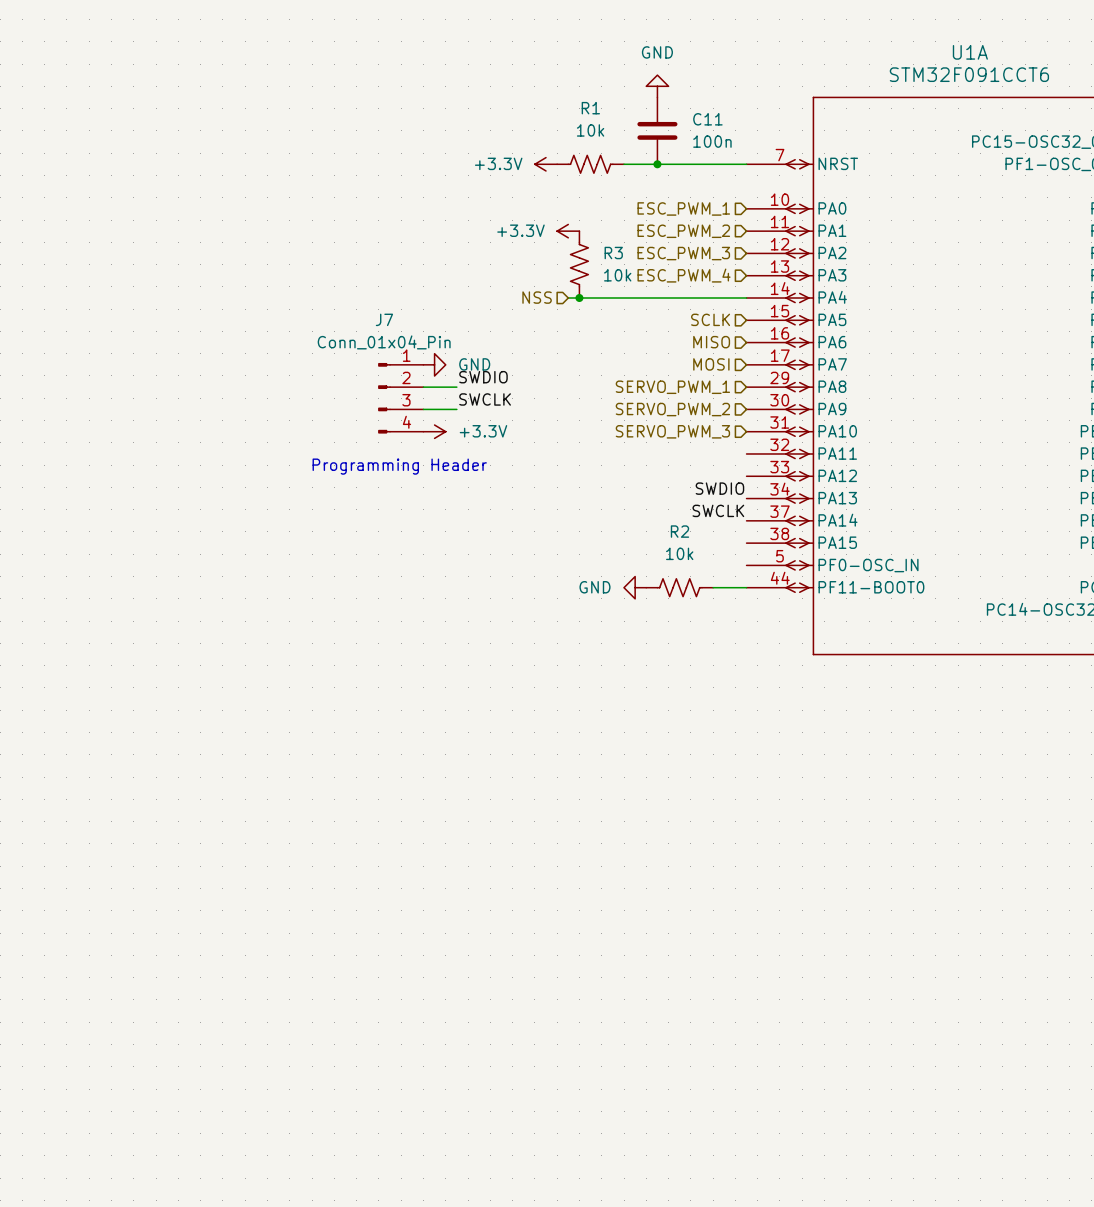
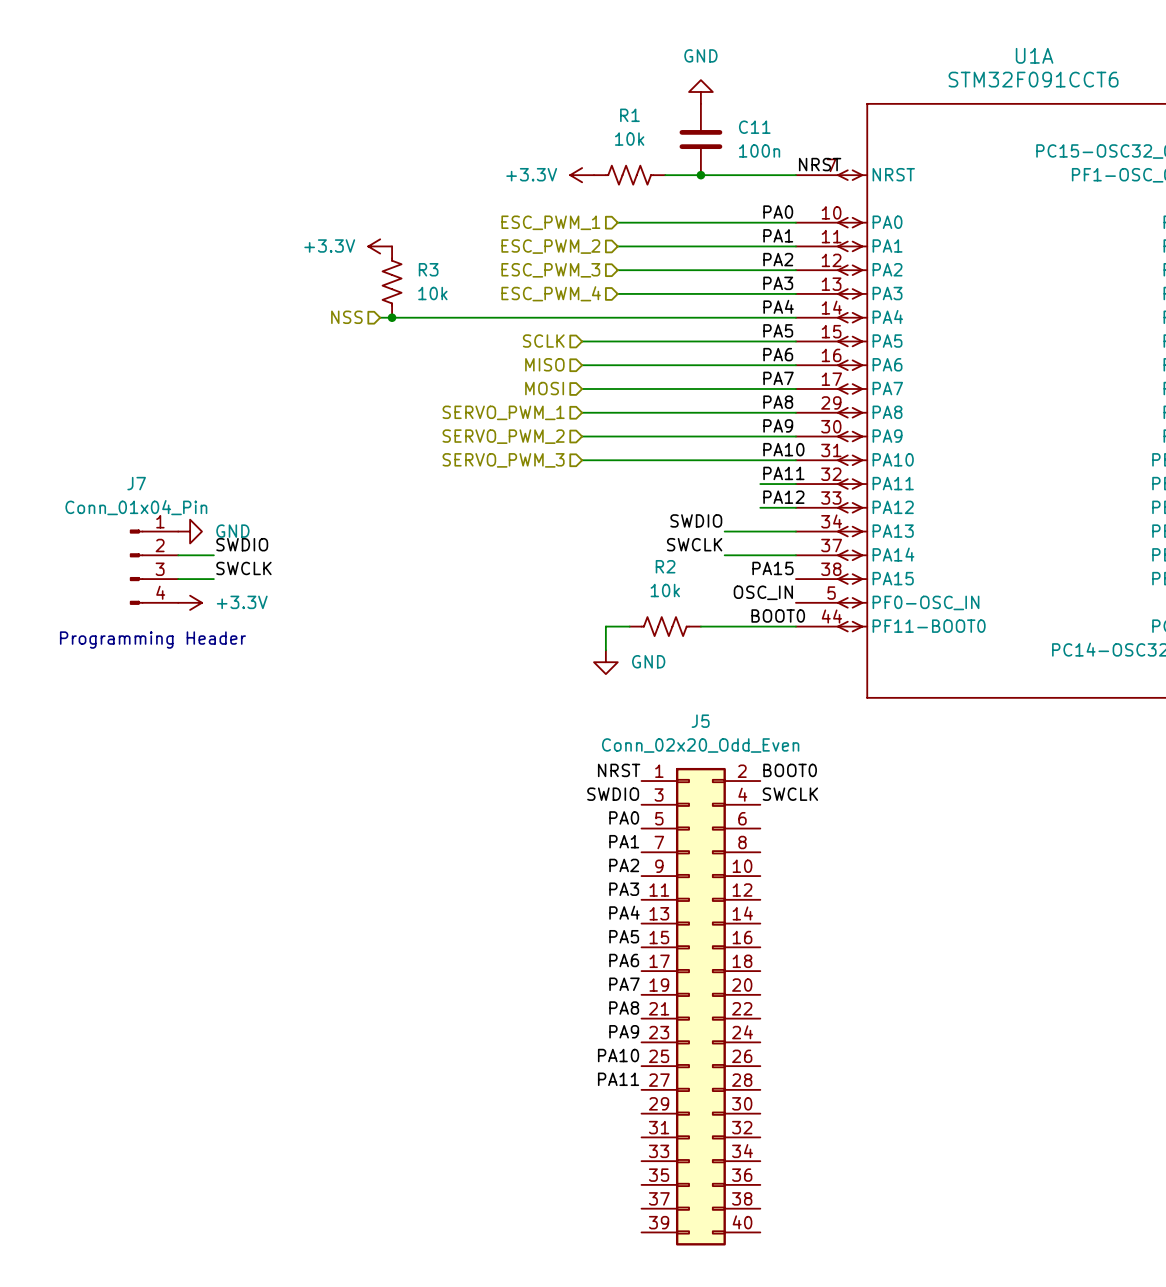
label: none -> NRST (820, 164)
label: none -> PA0 (778, 212)
wire: none -> (617, 222) (795, 222)
hierarchical label position: ESC_PWM_1 (683, 208) -> ESC_PWM_1 (550, 222)
label: none -> PA1 (778, 235)
power symbol: none -> +3.3V (380, 246)
power symbol: +3.3V (568, 231) -> none
wire: none -> (617, 246) (795, 246)
hierarchical label position: ESC_PWM_2 (683, 231) -> ESC_PWM_2 (550, 246)
label: none -> PA2 (778, 259)
wire: none -> (617, 270) (795, 270)
hierarchical label position: ESC_PWM_3 (683, 253) -> ESC_PWM_3 (550, 270)
R3 position: (579, 264) -> (392, 282)
label: none -> PA3 (778, 283)
wire: none -> (617, 293) (795, 293)
hierarchical label position: ESC_PWM_4 (684, 275) -> ESC_PWM_4 (551, 293)
label: none -> PA4 (778, 306)
wire: none -> (380, 317) (605, 317)
junction: none -> (392, 317)
hierarchical label position: NSS (537, 297) -> NSS (346, 317)
junction: (579, 297) -> none
label: none -> PA5 (778, 330)
hierarchical label position: SCLK (710, 319) -> SCLK (543, 341)
wire: none -> (582, 341) (795, 341)
label: none -> PA6 (778, 354)
wire: none -> (582, 365) (795, 365)
hierarchical label position: MISO (711, 342) -> MISO (544, 364)
label: none -> PA7 (778, 378)
power symbol: GND (434, 364) -> none
wire: none -> (582, 388) (795, 388)
hierarchical label position: MOSI (711, 364) -> MOSI (544, 388)
label: SWDIO (483, 377) -> none
label: none -> PA8 (778, 402)
wire: (423, 387) (456, 387) -> none
wire: none -> (582, 412) (795, 412)
hierarchical label position: SERVO_PWM_1 (672, 387) -> SERVO_PWM_1 (503, 412)
J7 position: (400, 398) -> (154, 567)
label: SWCLK (485, 399) -> none
label: none -> PA9 (778, 425)
wire: (423, 409) (456, 409) -> none
wire: none -> (582, 436) (795, 436)
hierarchical label position: SERVO_PWM_2 (672, 409) -> SERVO_PWM_2 (503, 436)
label: none -> PA10 (783, 449)
power symbol: +3.3V (434, 431) -> none
wire: none -> (582, 460) (795, 460)
hierarchical label position: SERVO_PWM_3 (672, 431) -> SERVO_PWM_3 (503, 460)
label: none -> PA11 (783, 473)
wire: none -> (760, 484) (795, 484)
text: Programming Header (399, 466) -> none
label: none -> PA12 (783, 497)
wire: none -> (760, 507) (795, 507)
label position: SWDIO (719, 488) -> SWDIO (696, 520)
power symbol: none -> GND (190, 531)
wire: none -> (724, 531) (795, 531)
label: none -> SWDIO (242, 544)
label position: SWCLK (718, 510) -> SWCLK (694, 544)
wire: none -> (178, 555) (213, 555)
wire: none -> (724, 555) (795, 555)
label: none -> SWCLK (243, 568)
label: none -> PA15 (772, 568)
wire: none -> (178, 579) (213, 579)
label: none -> OSC_IN (763, 592)
power symbol: none -> +3.3V (190, 602)
label: none -> BOOT0 (778, 615)
wire: none -> (629, 626) (605, 626) (605, 650)
power symbol text position: GND (594, 587) -> GND (648, 661)
power symbol rotation: 0° (635, 587) -> 90° counterclockwise (605, 662)
power symbol position: GND (635, 587) -> GND (605, 662)
R2 position: (679, 587) -> (665, 626)
text: none -> Programming Header (152, 640)
label: none -> NRST (619, 770)
label: none -> BOOT0 (790, 770)
label: none -> SWDIO (613, 794)
label: none -> SWCLK (790, 794)
label: none -> PA0 (624, 817)
label: none -> PA1 (624, 841)
label: none -> PA2 (624, 865)
label: none -> PA3 (624, 889)
label: none -> PA4 (624, 912)
label: none -> PA5 (624, 936)
label: none -> PA6 (624, 960)
label: none -> PA7 (624, 984)
J5: none -> Conn_02x20_Odd_Even (700, 1006)
label: none -> PA8 (624, 1008)
label: none -> PA9 (624, 1031)
label: none -> PA10 (618, 1055)
label: none -> PA11 (618, 1079)

